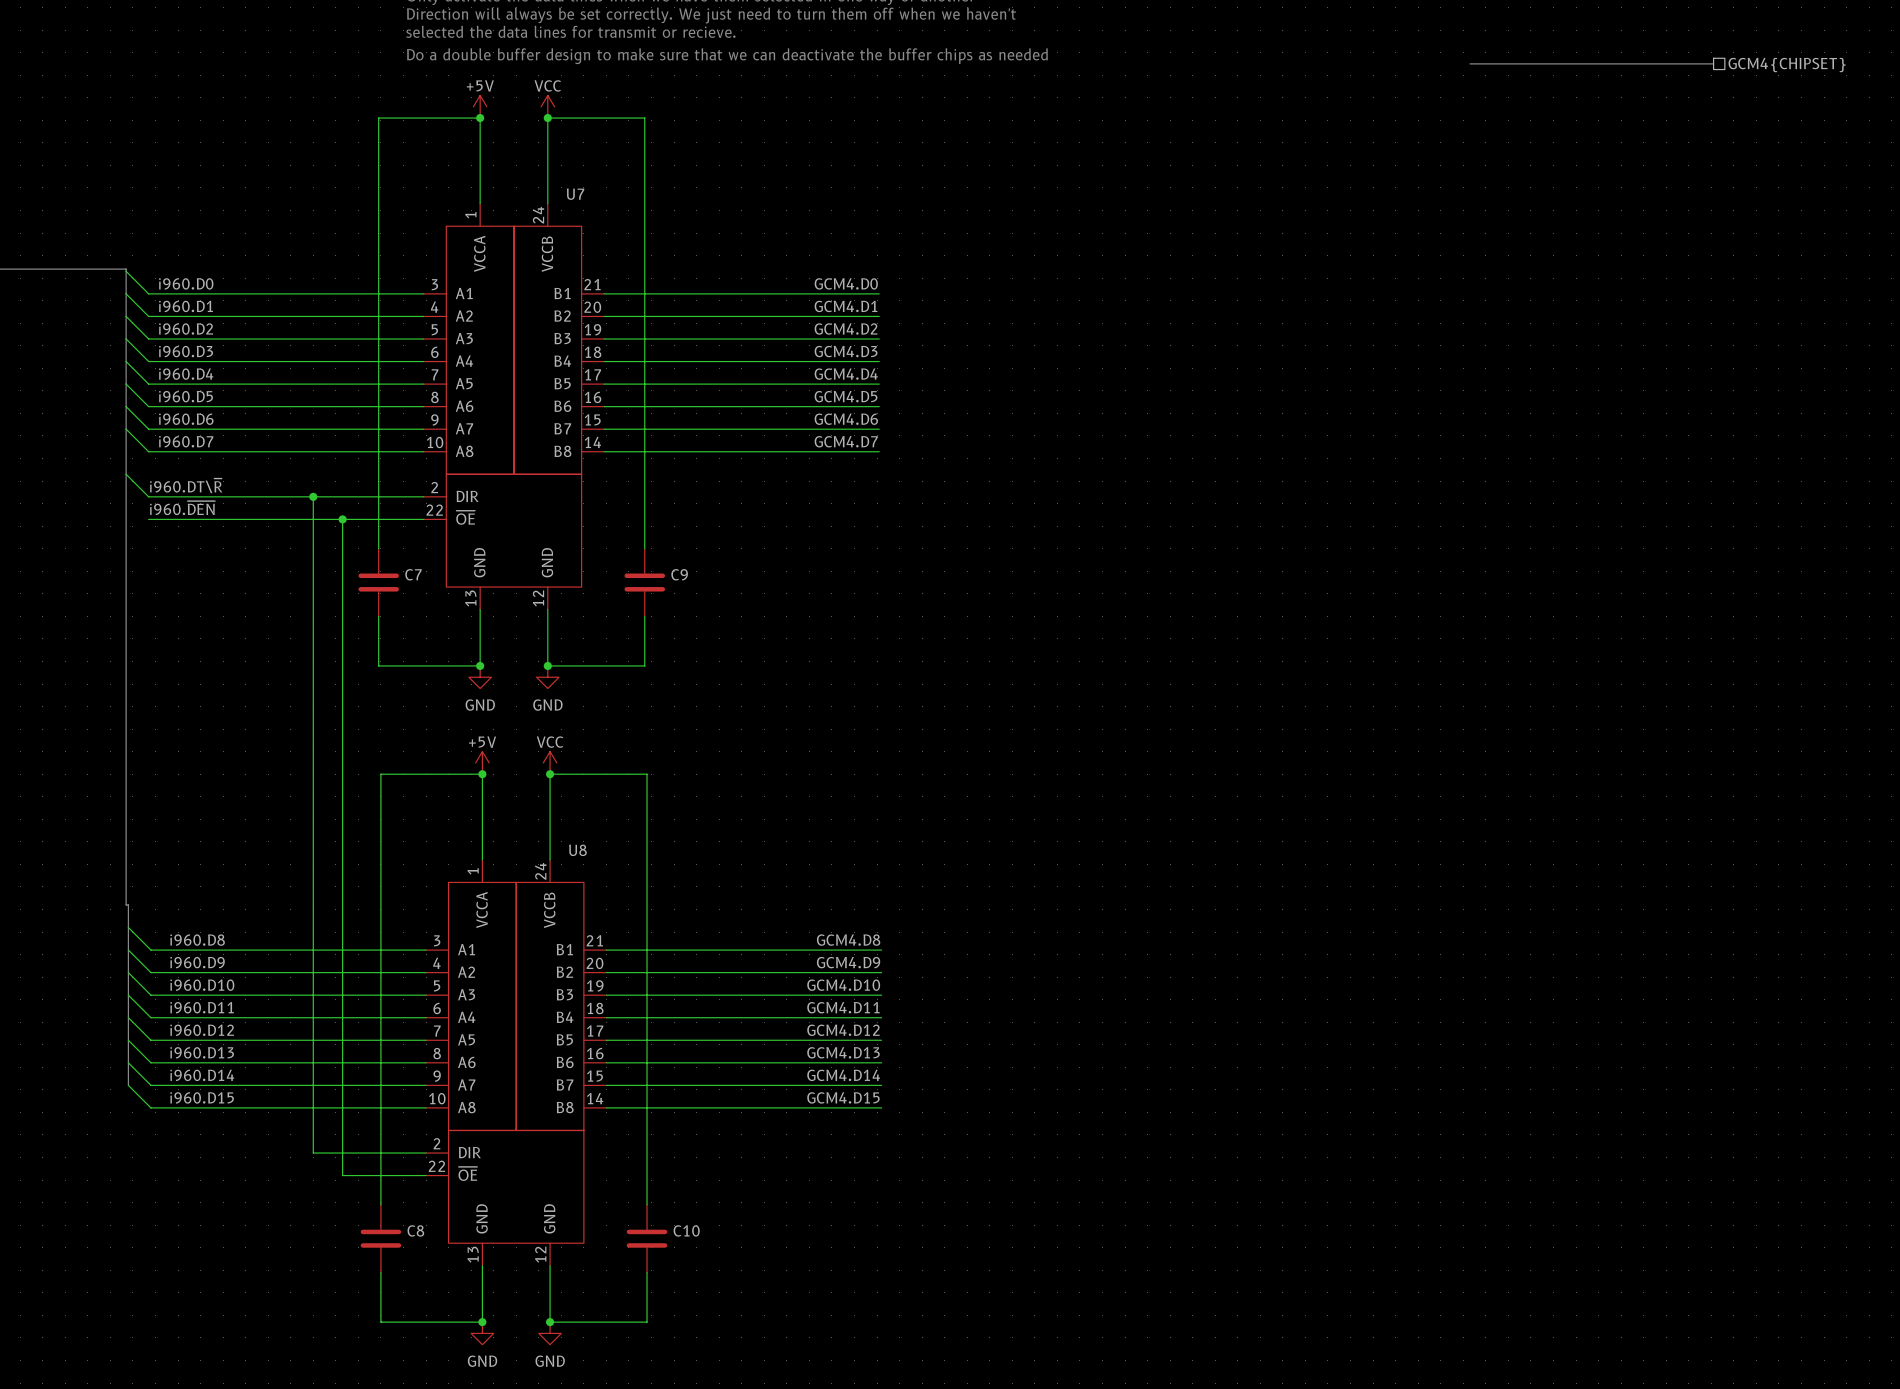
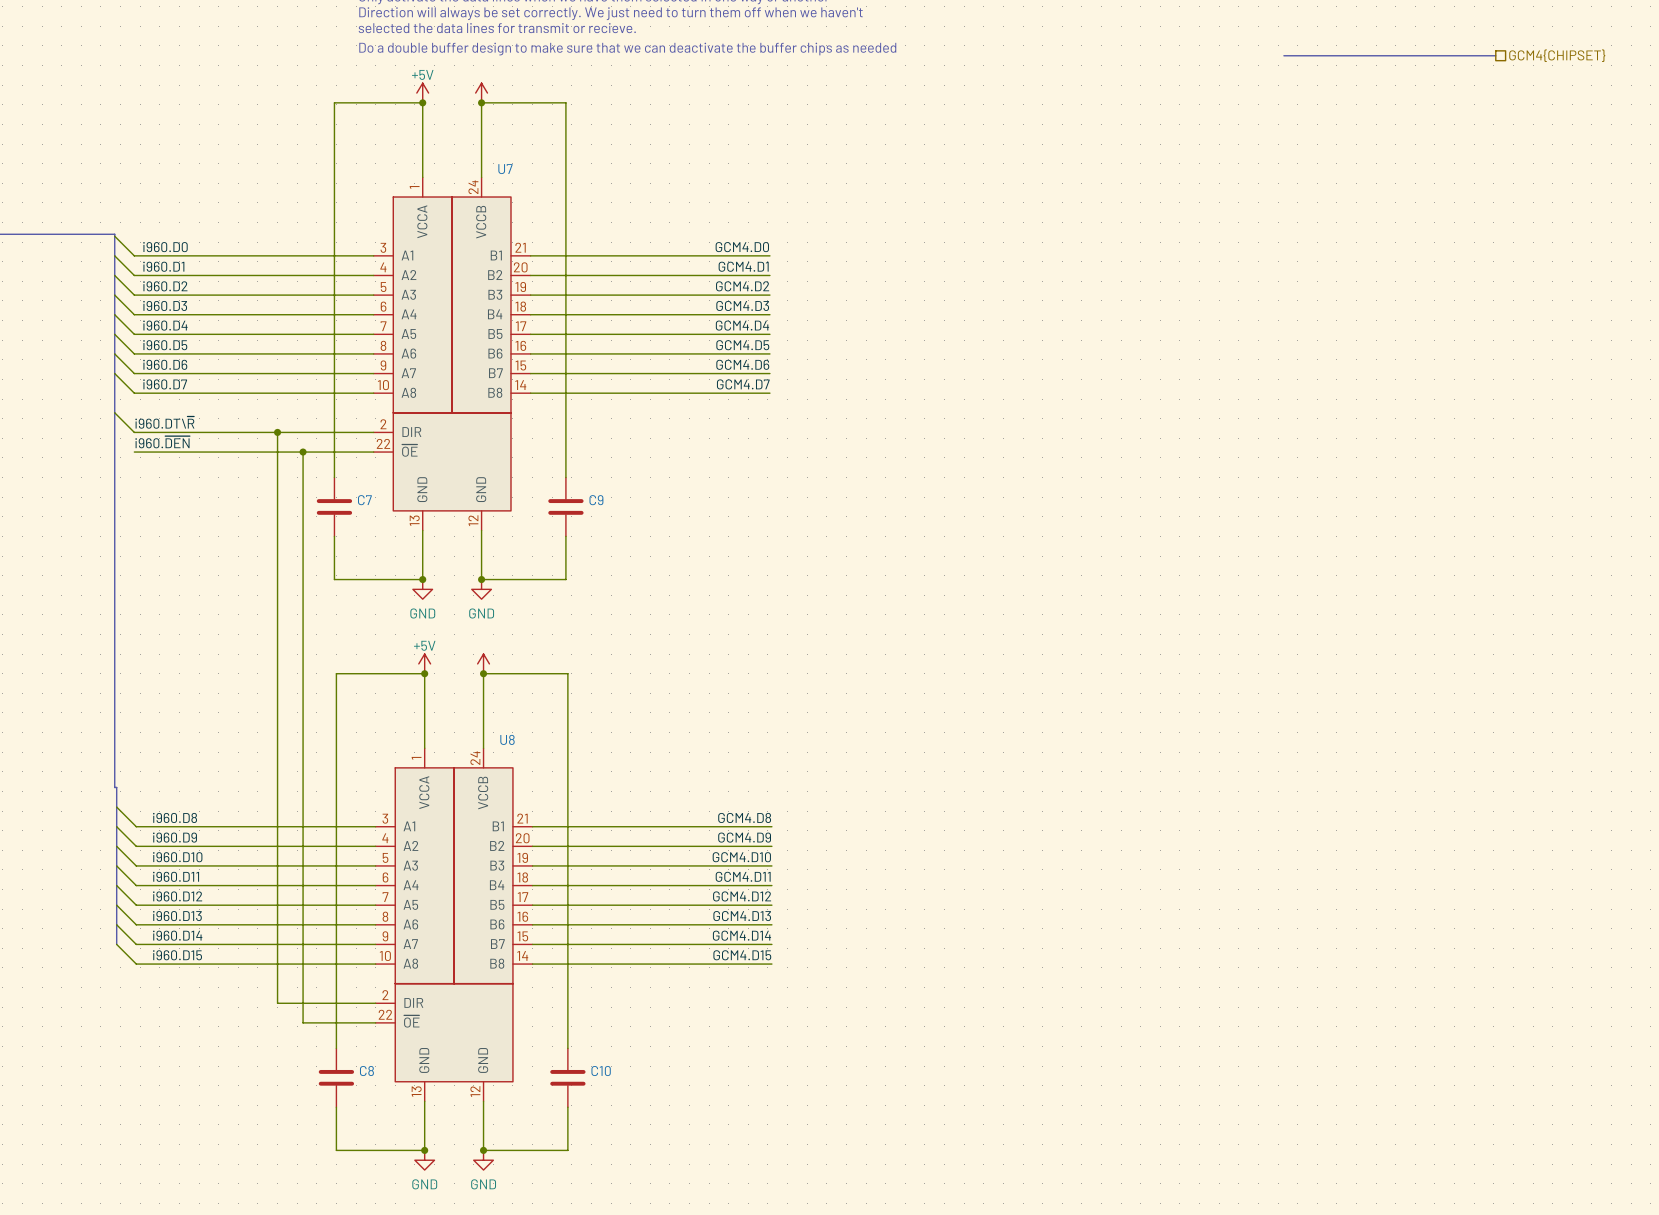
power symbol text: VCC (547, 85) -> none
power symbol text: VCC (550, 742) -> none

